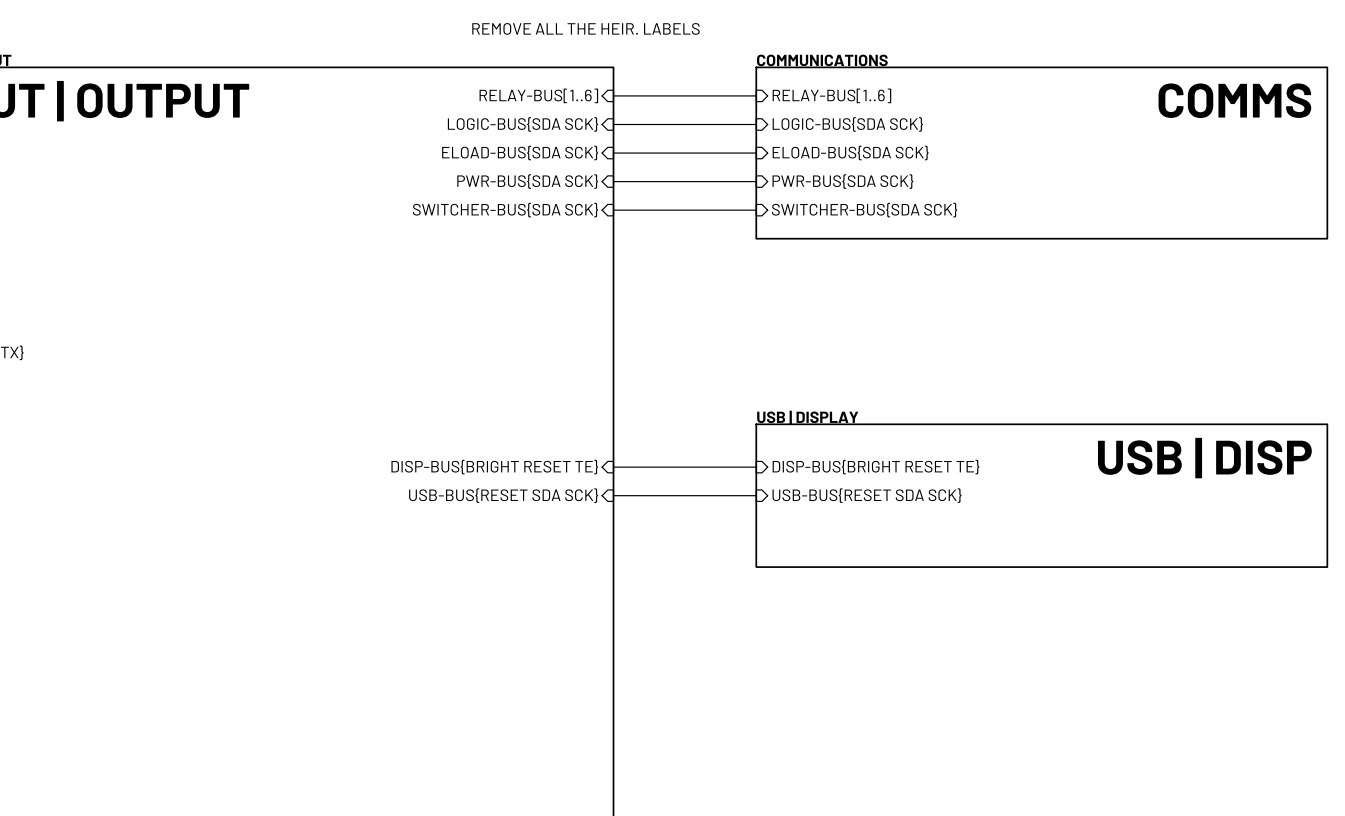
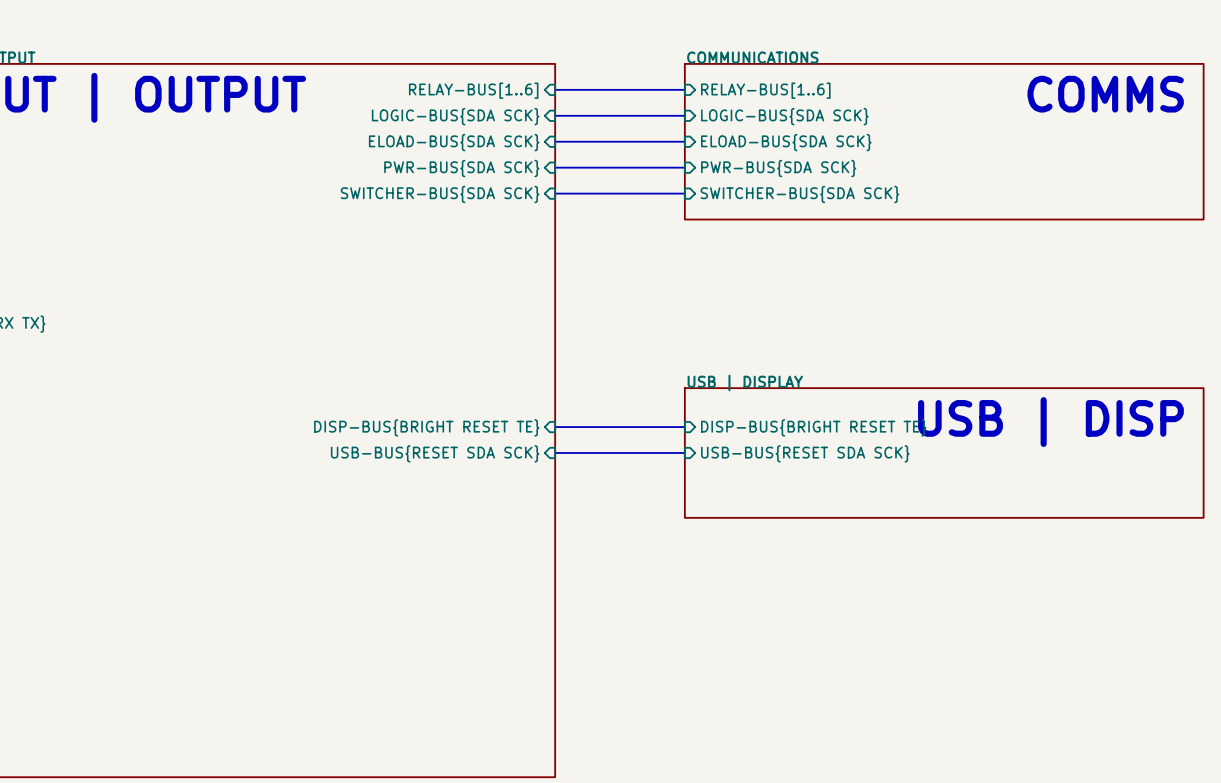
text: REMOVE ALL THE HEIR. LABELS (585, 28) -> none

